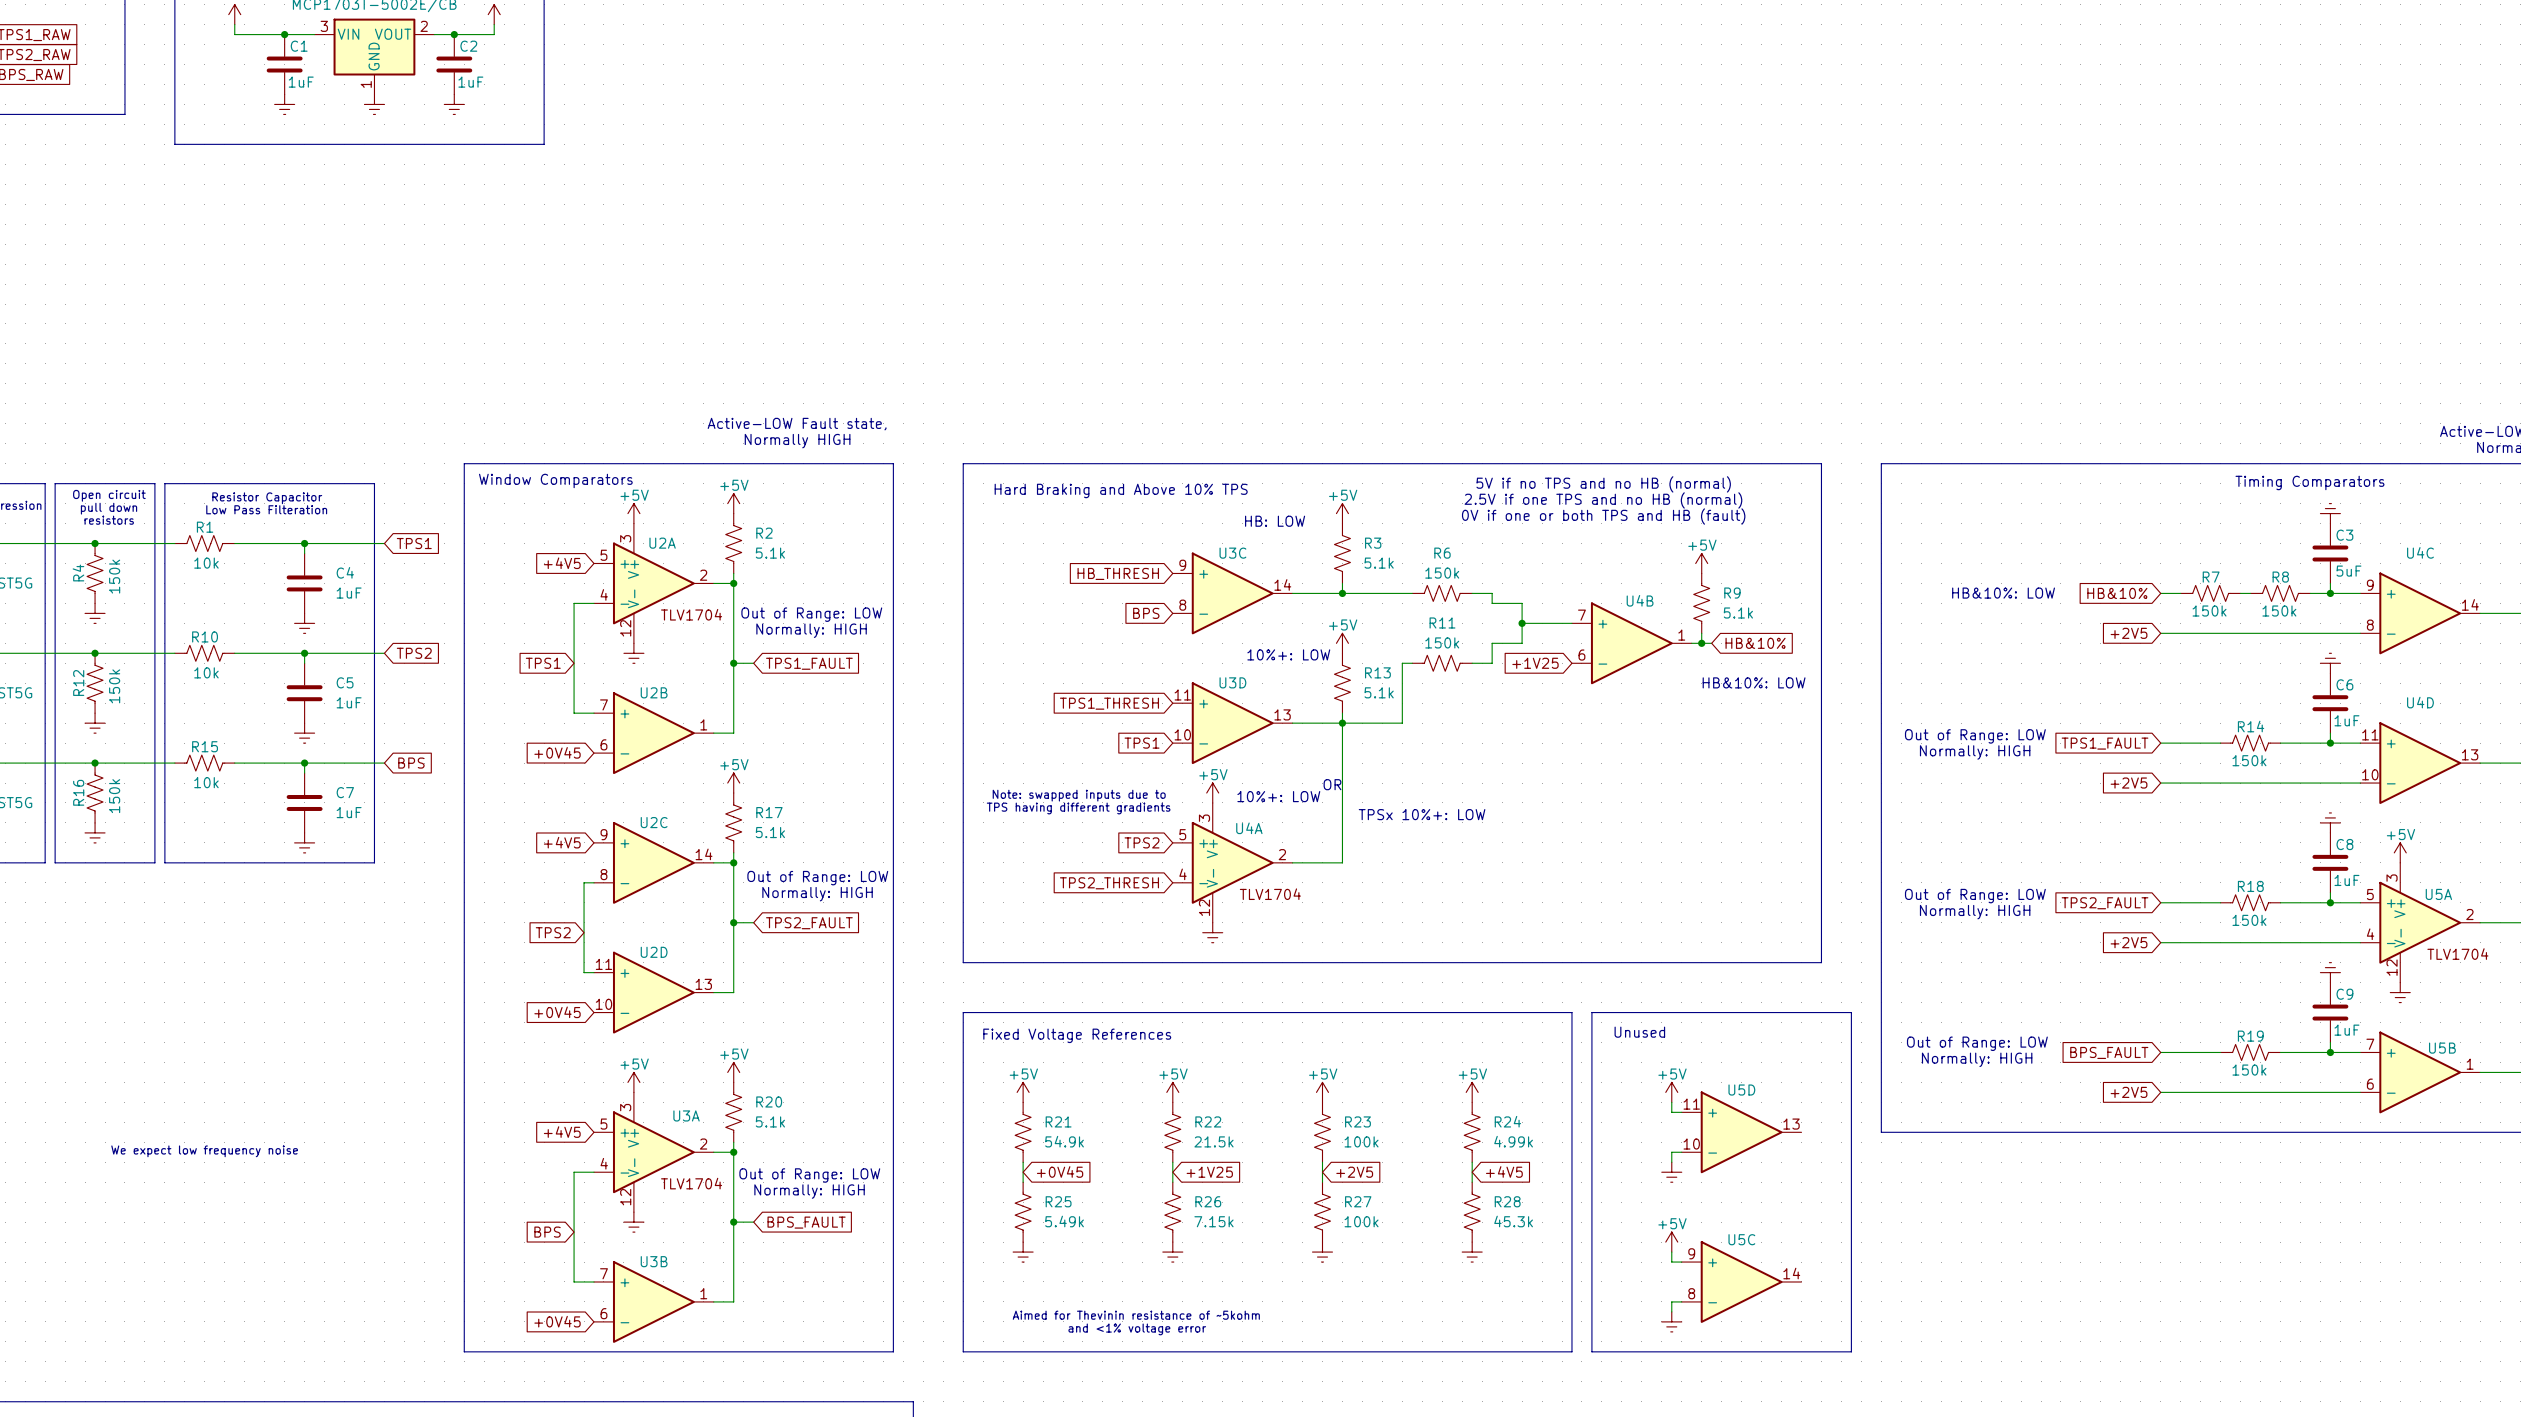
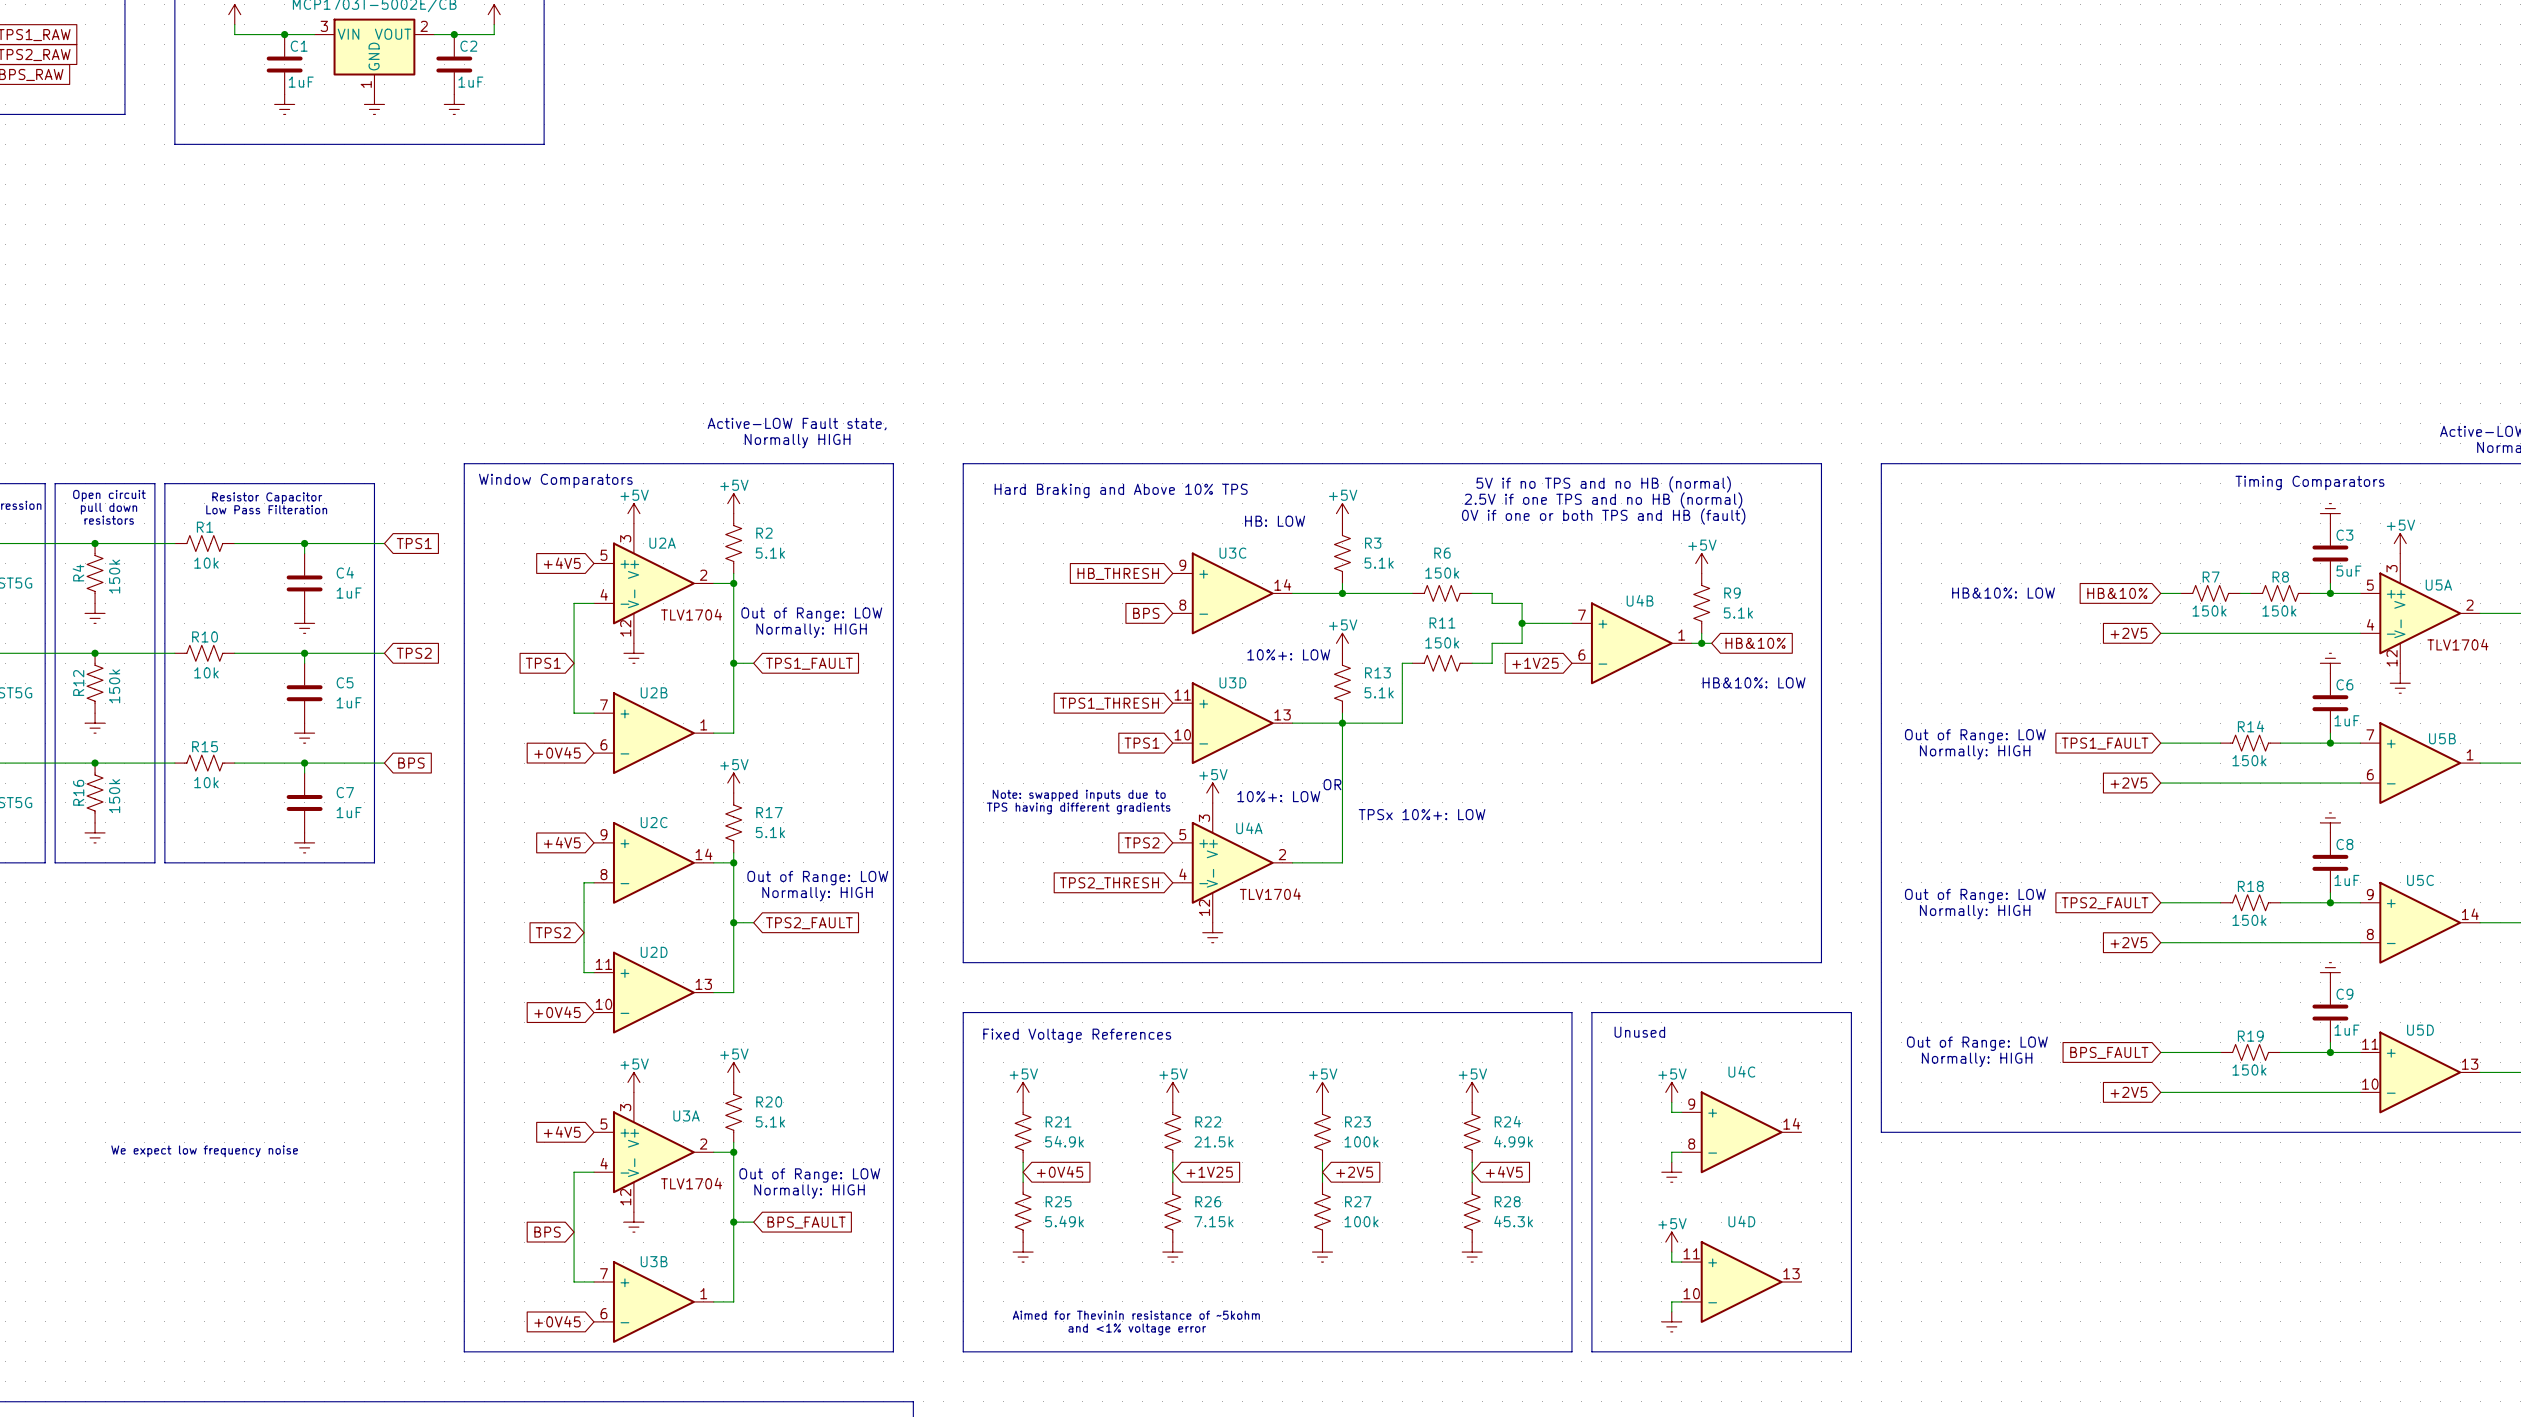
power symbol: none -> +5V (2400, 543)
U4C position: (2420, 613) -> (1741, 1132)
power symbol: none -> (2400, 683)
U4D position: (2420, 763) -> (1741, 1281)
power symbol: +5V (2400, 852) -> none
U5A position: (2420, 922) -> (2420, 613)
power symbol: (2400, 992) -> none
U5B position: (2420, 1072) -> (2420, 763)
U5D position: (1741, 1132) -> (2420, 1072)
U5C position: (1741, 1281) -> (2420, 922)

